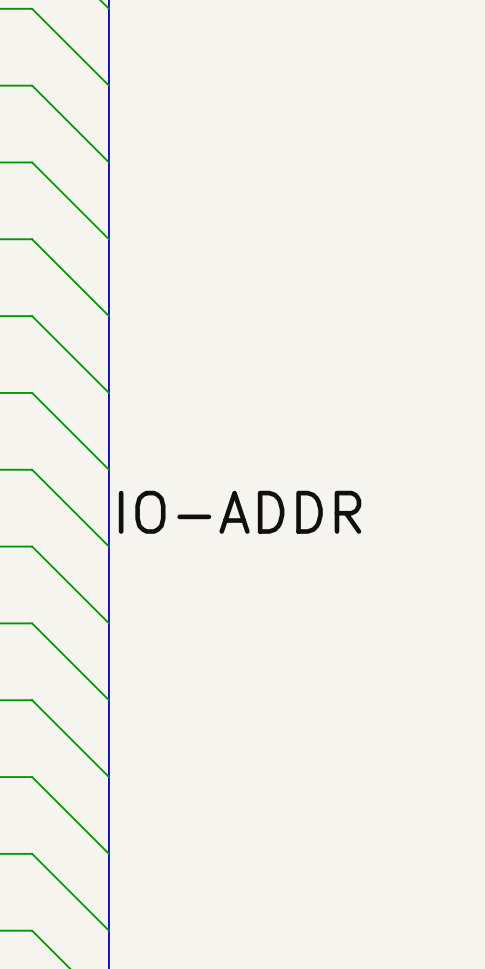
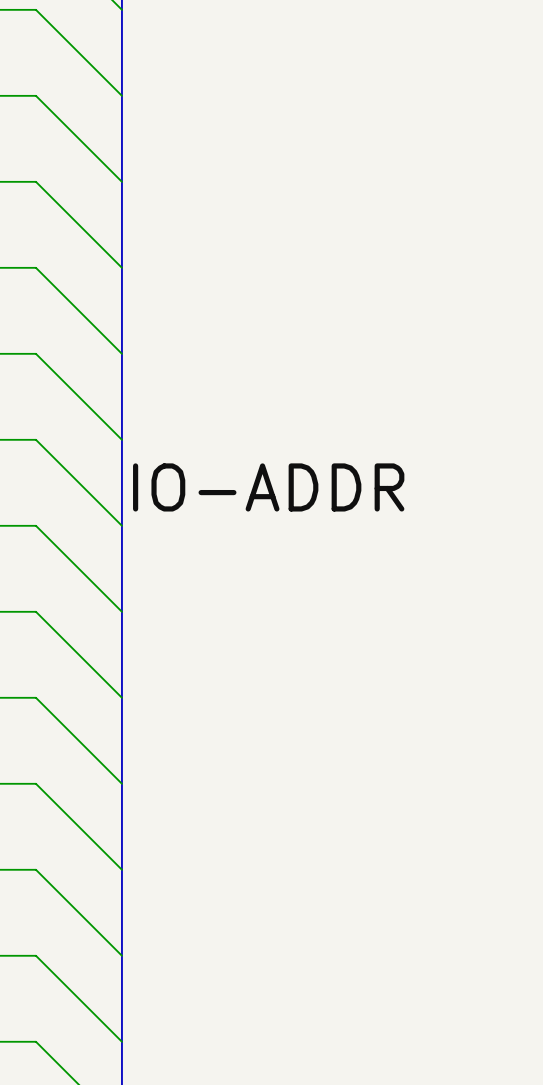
label position: IO-ADDR (240, 512) -> IO-ADDR (268, 487)

